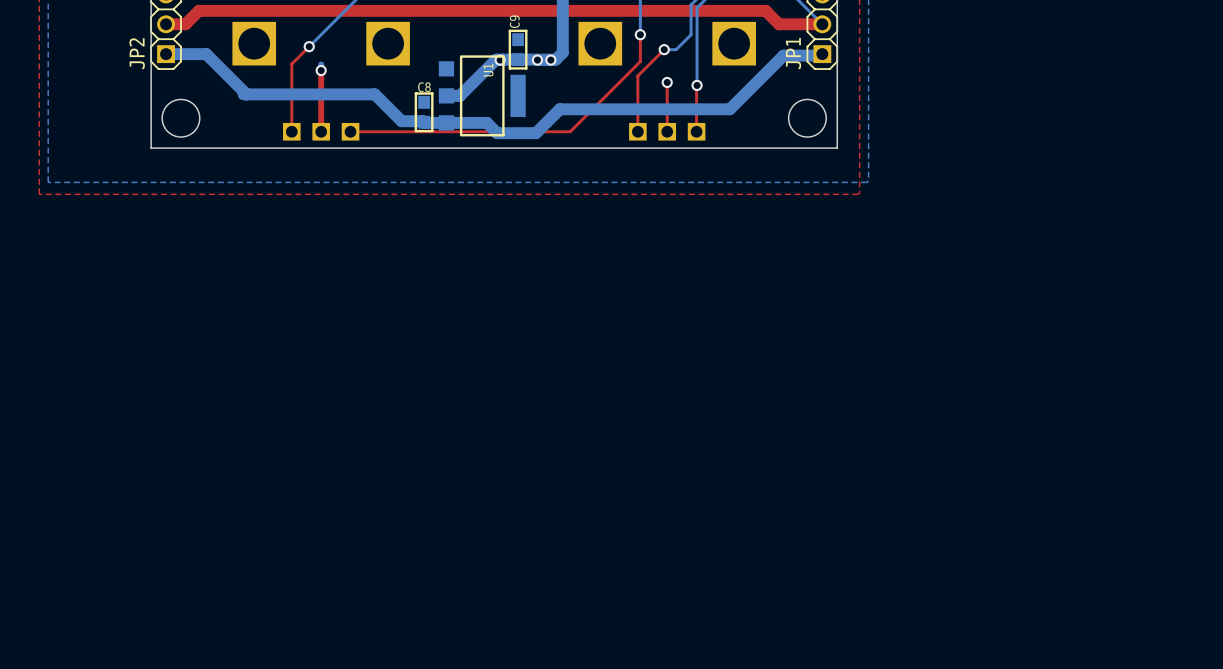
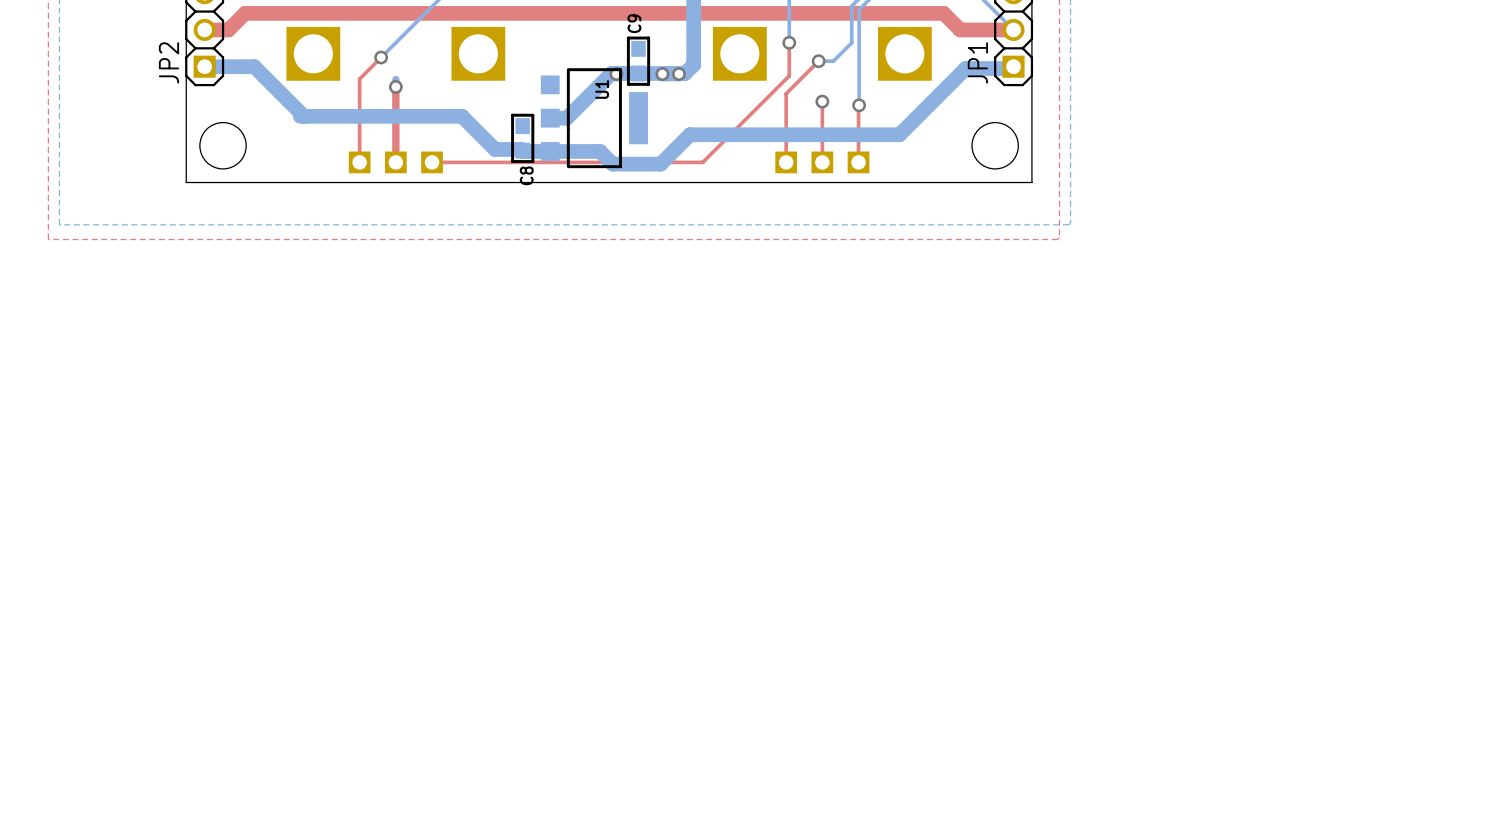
C8 name rotation: 0° (424, 87) -> 90° counterclockwise (526, 175)
C8 name position: C8 (424, 87) -> C8 (526, 175)

